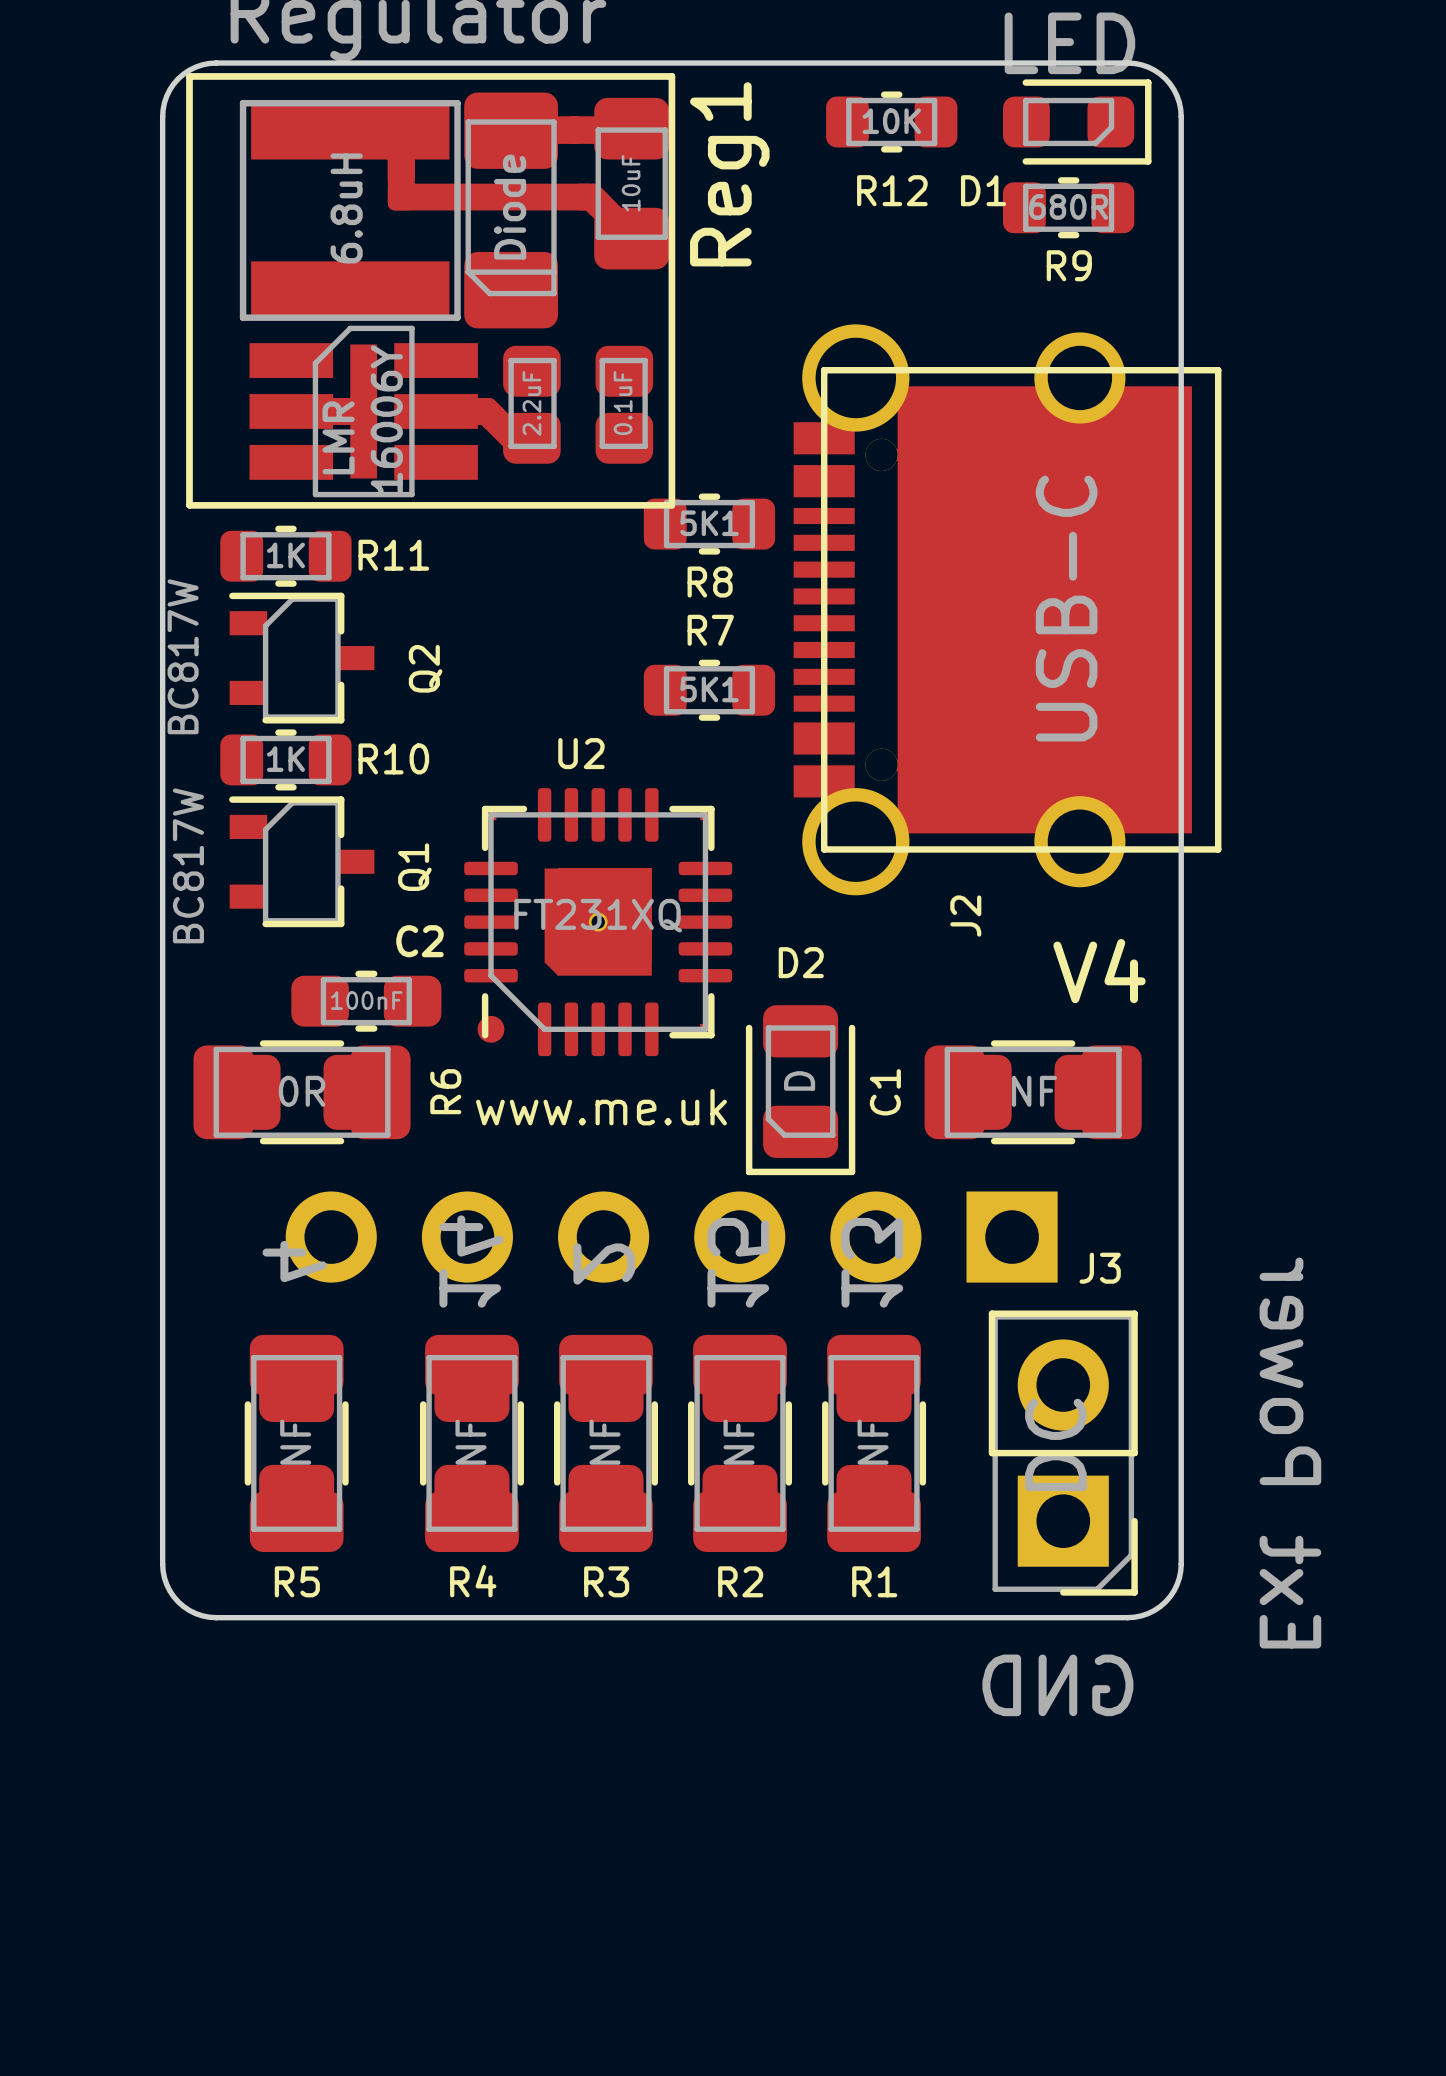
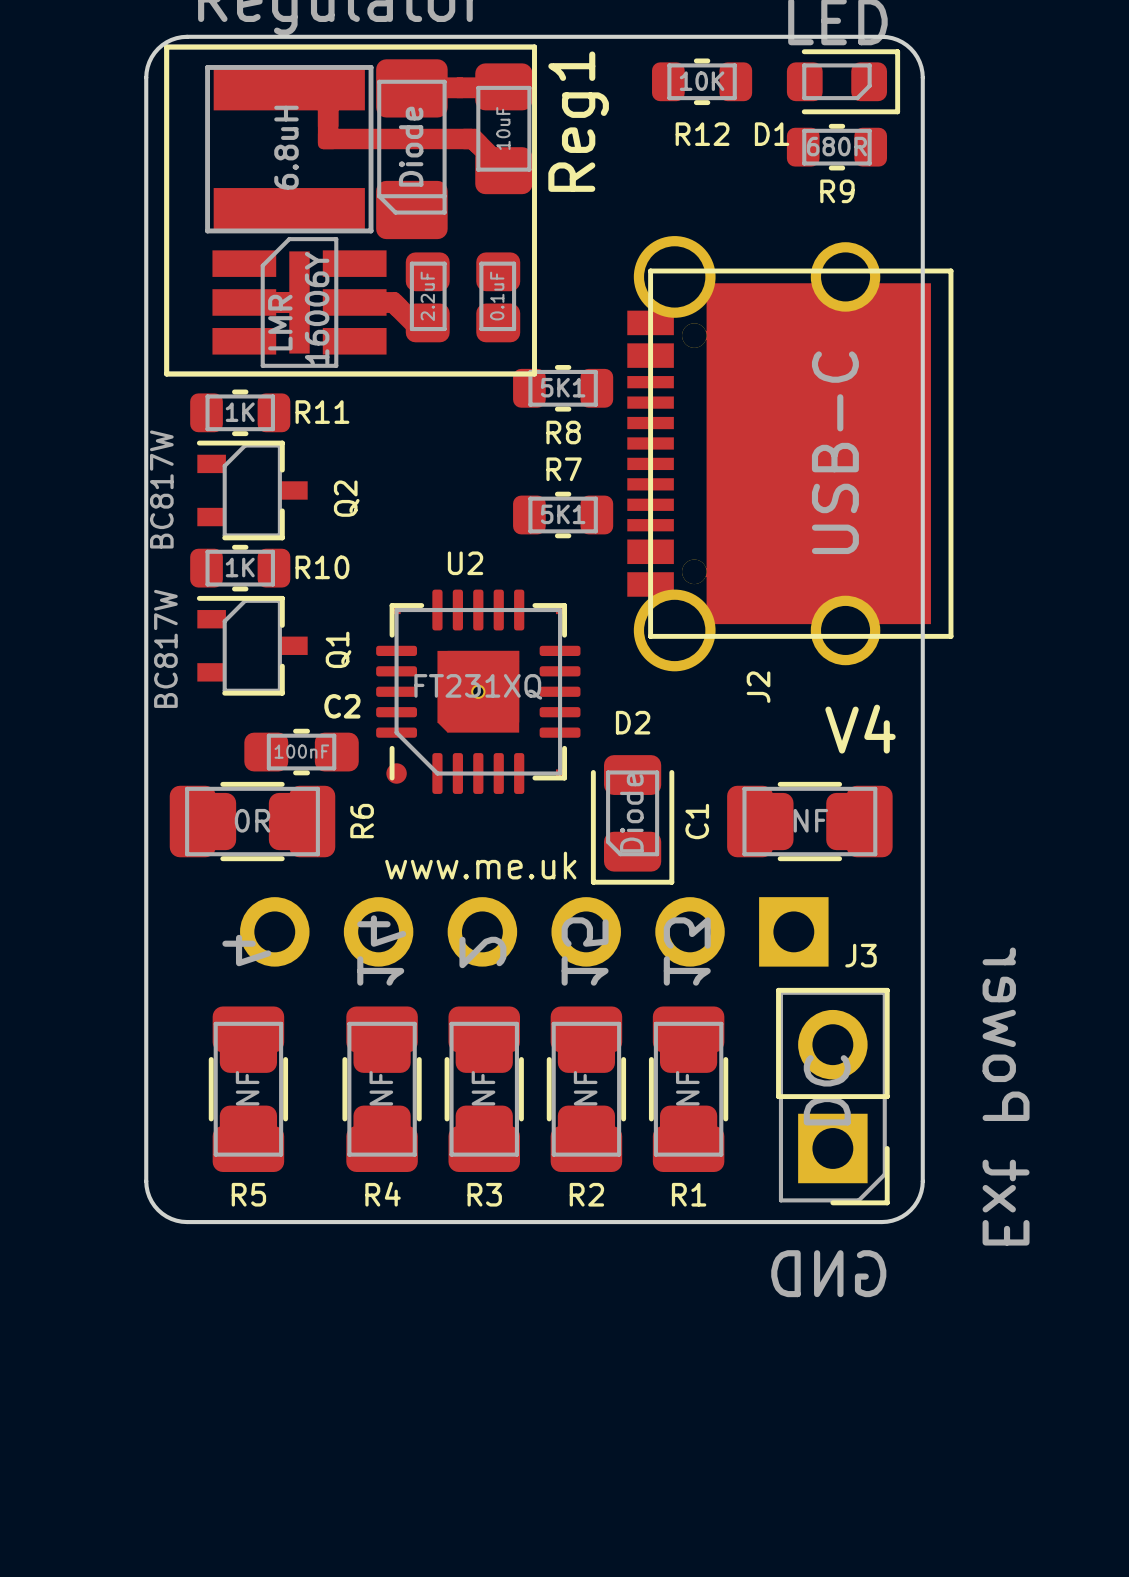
D2 value: D (799, 1080) -> Diode (631, 812)
text position: www.me.uk (601, 1107) -> www.me.uk (480, 865)

